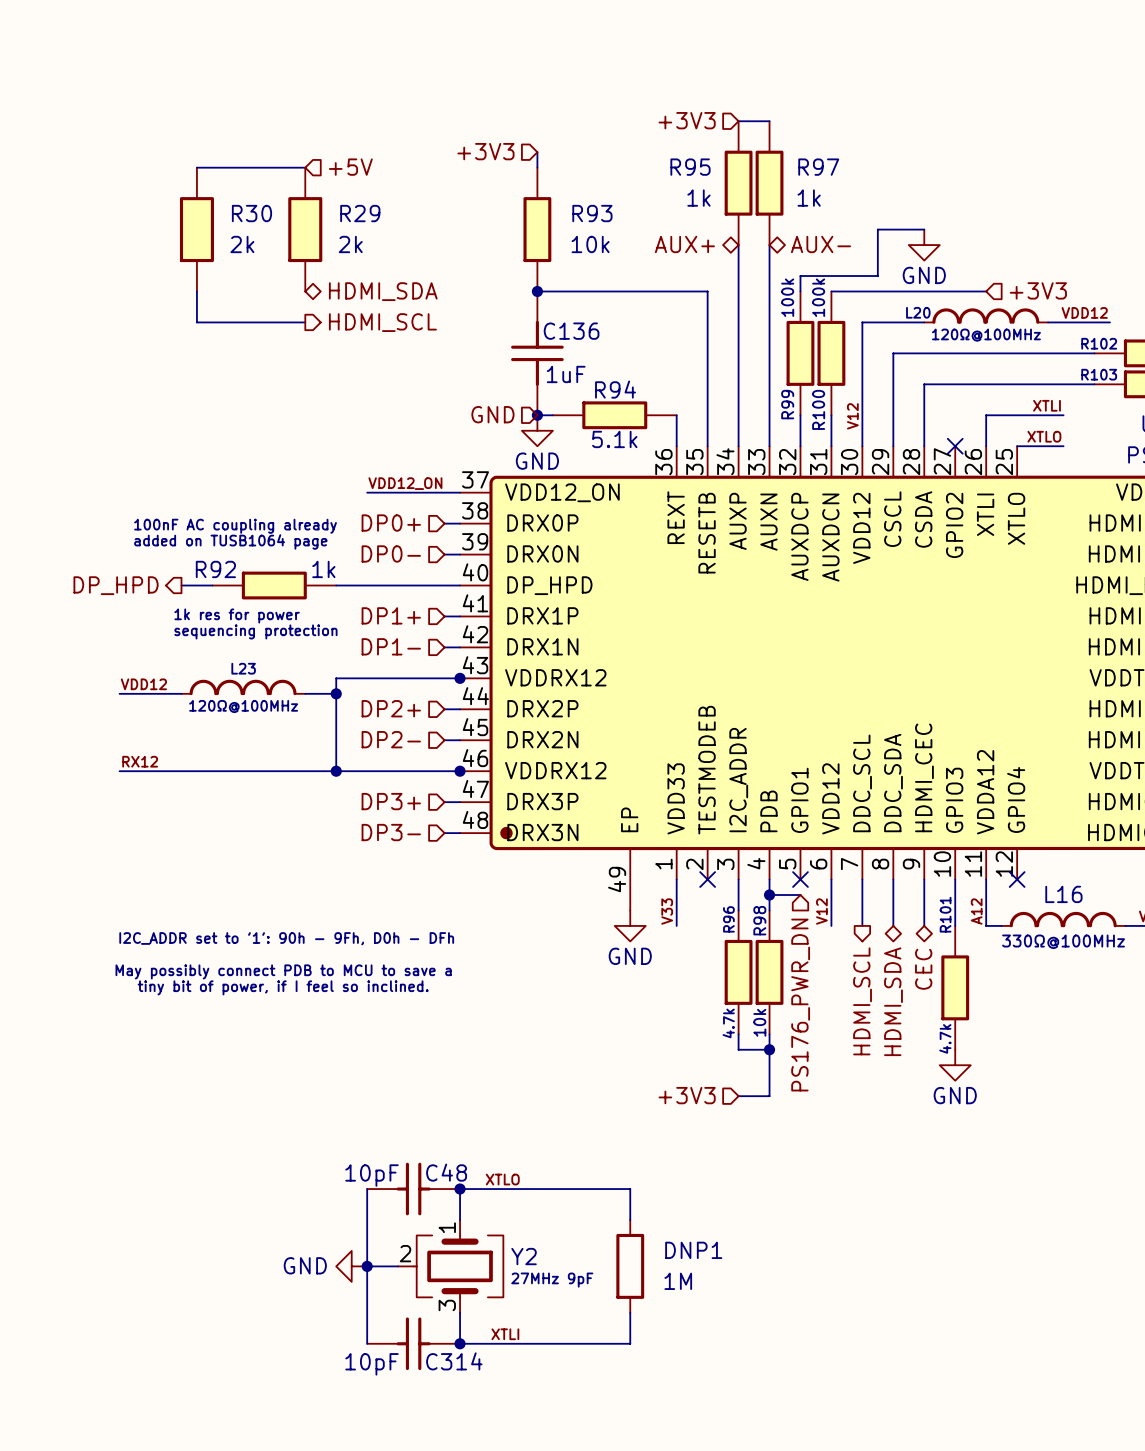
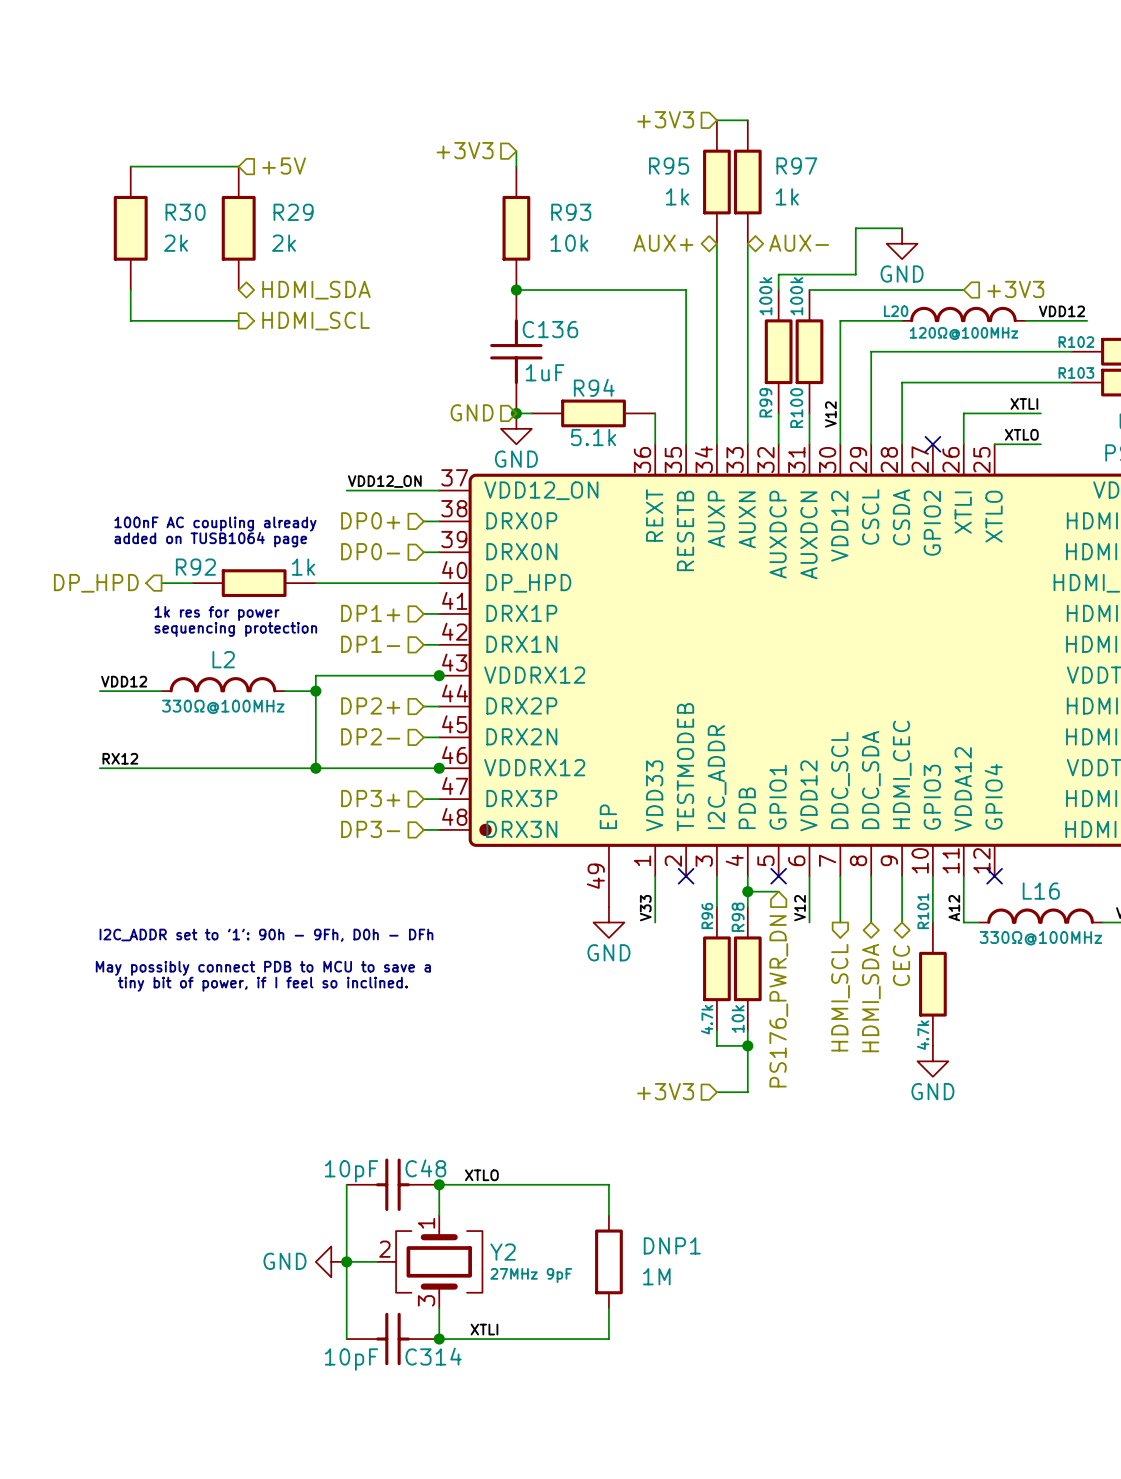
wire: (258, 167) (305, 167) -> (130, 166) (177, 166)
hierarchical label position: +5V (350, 167) -> +5V (284, 166)
R30 position: (196, 229) -> (130, 228)
R29 position: (305, 229) -> (238, 228)
wire: (196, 291) (196, 322) -> (130, 290) (130, 320) (177, 320)
hierarchical label position: HDMI_SDA (383, 291) -> HDMI_SDA (316, 290)
wire: (258, 322) (305, 322) -> none
hierarchical label position: HDMI_SCL (382, 322) -> HDMI_SCL (316, 321)
L23: 120Ω@100MHz (243, 687) -> none
L2: none -> 330Ω@100MHz (223, 684)

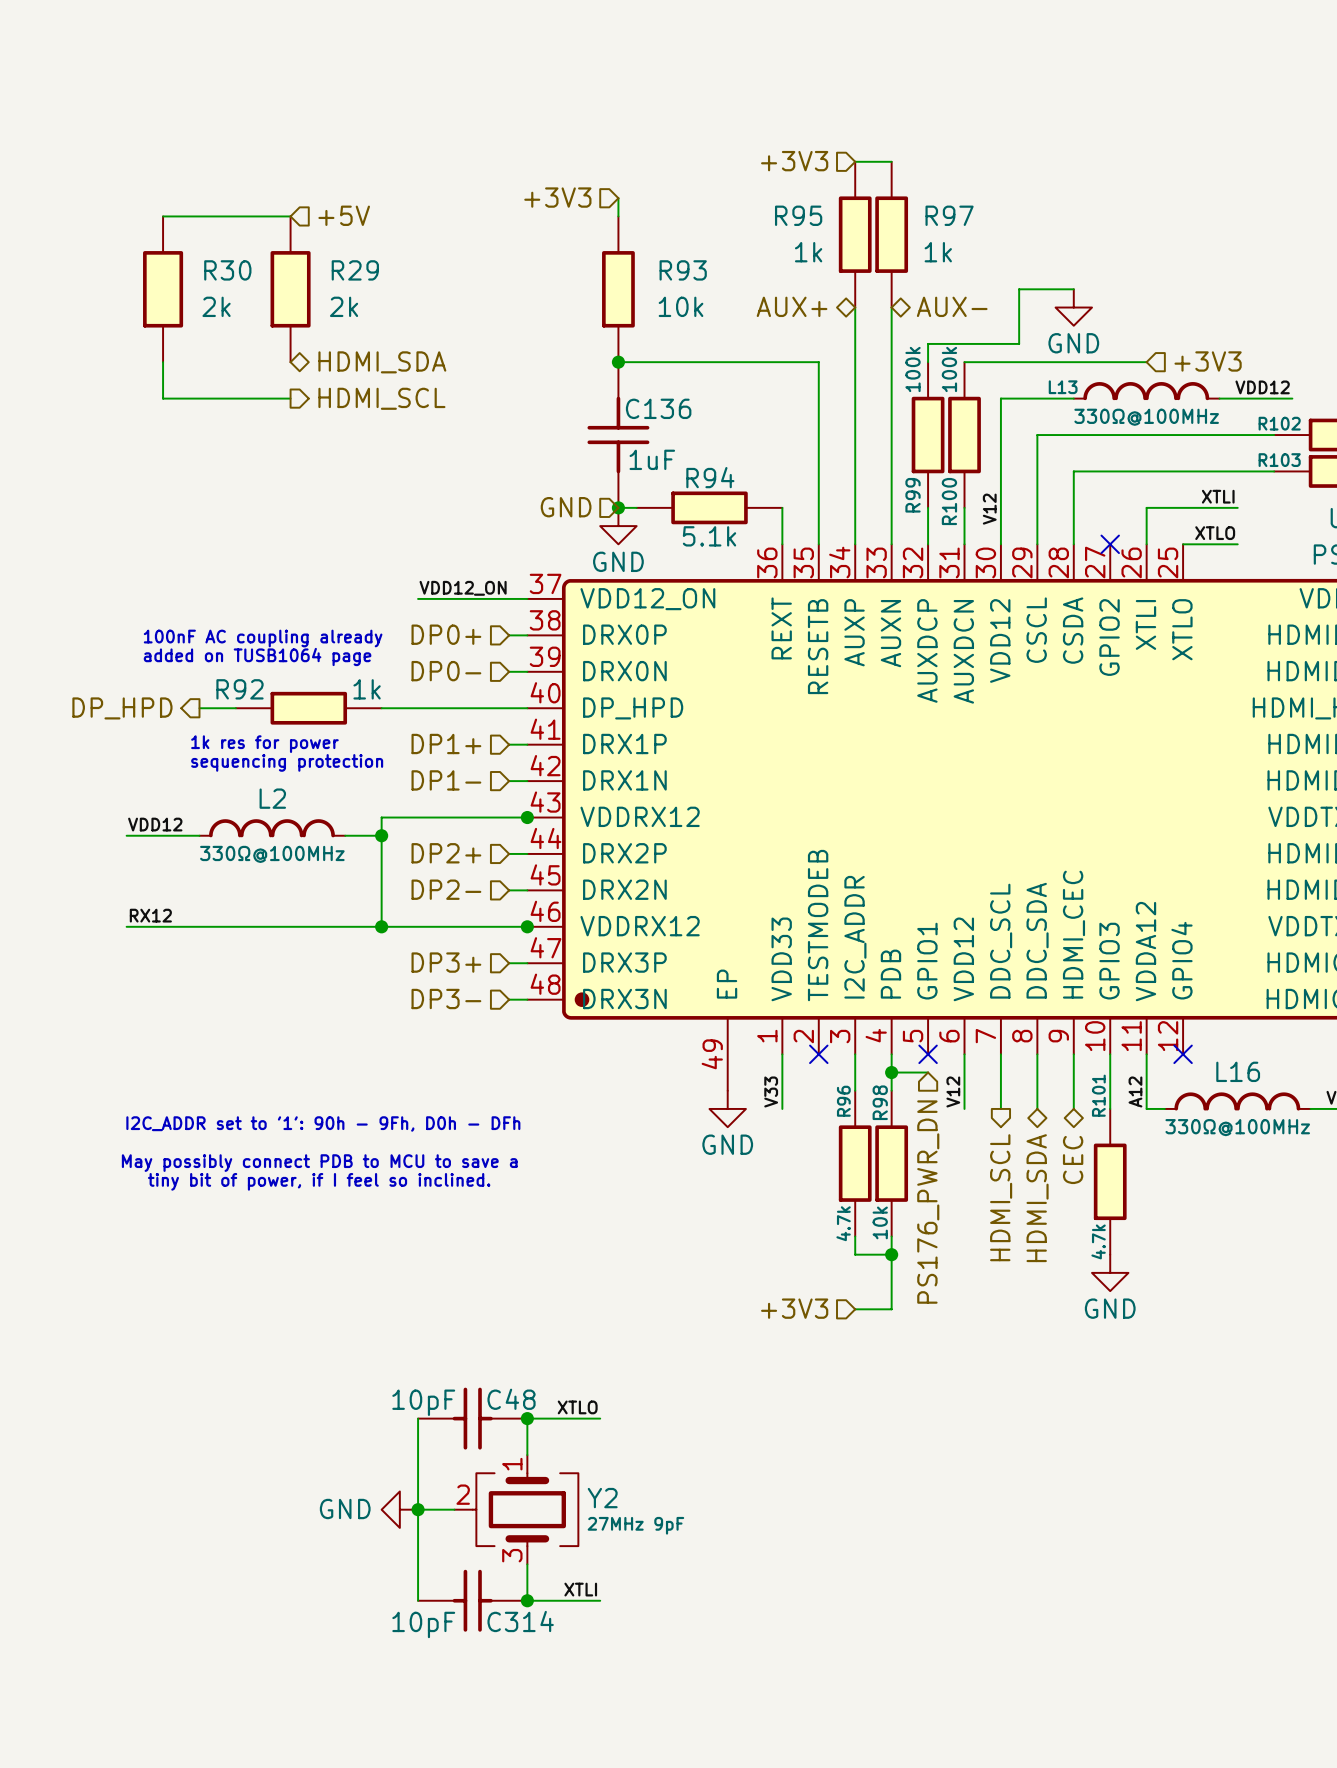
L20: 120Ω@100MHz (963, 314) -> none
L13: none -> 330Ω@100MHz (1146, 391)
wire: (500, 1184) (608, 1184) (608, 1215) -> none
DNP1: 1M (608, 1261) -> none
wire: (608, 1308) (608, 1339) (500, 1339) -> none

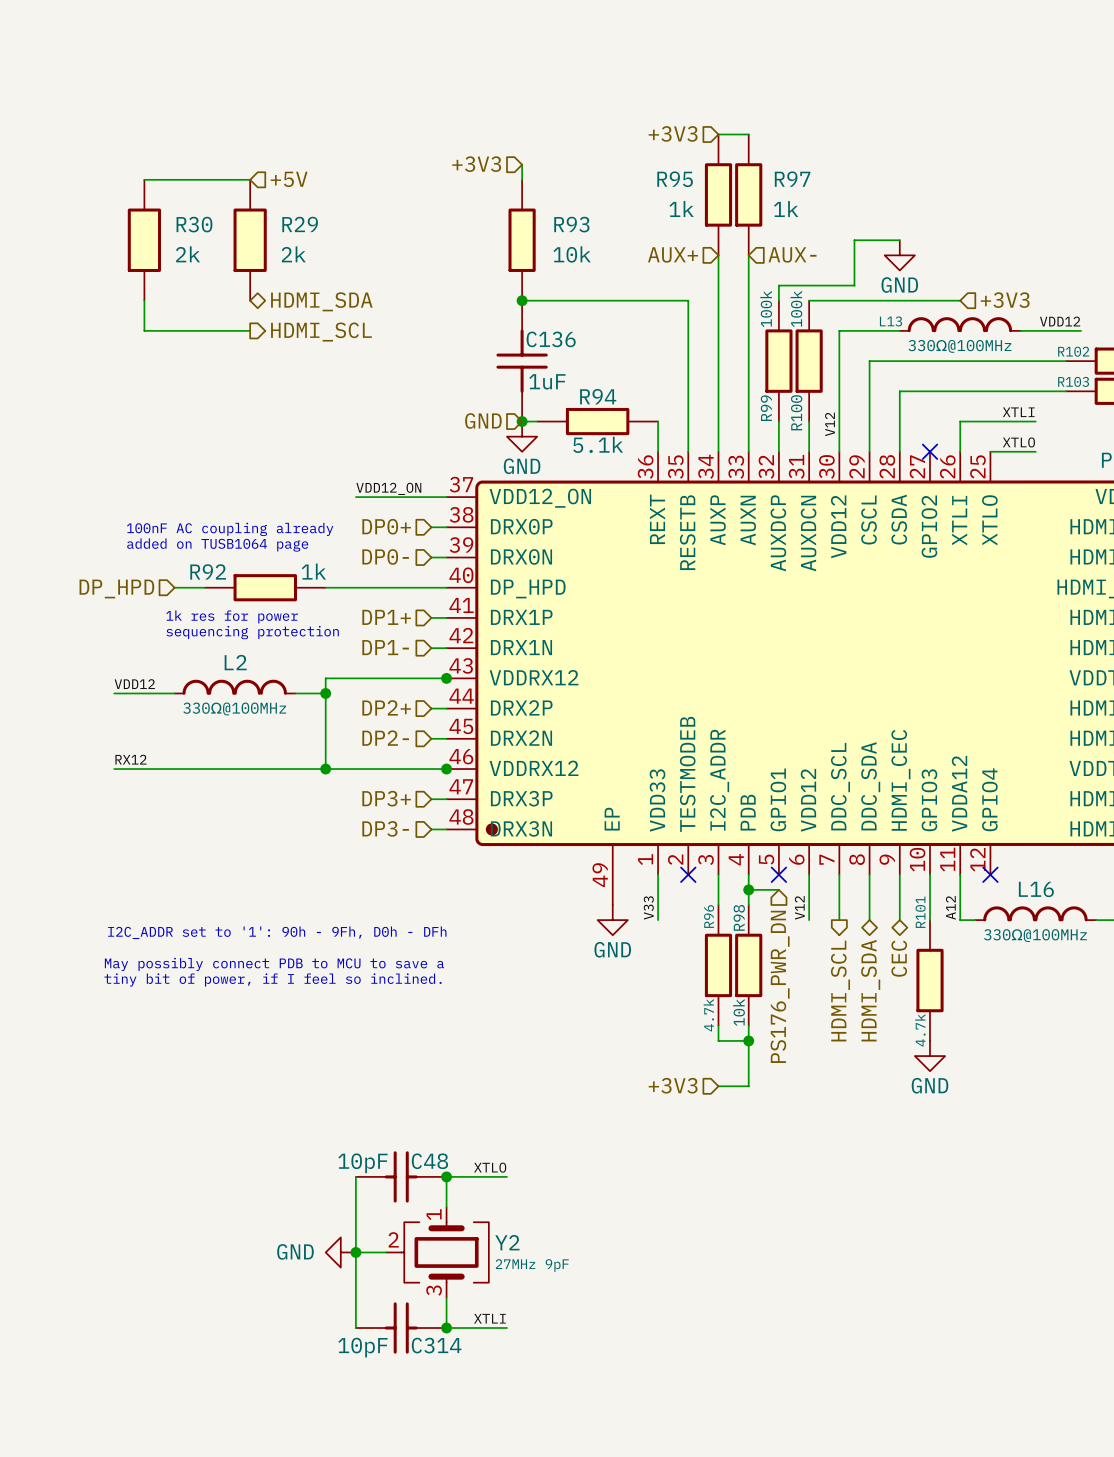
hierarchical label shape: bidirectional (792, 306) -> input (673, 254)
hierarchical label shape: bidirectional (952, 306) -> input (792, 254)
hierarchical label shape: output (122, 708) -> input (116, 588)

